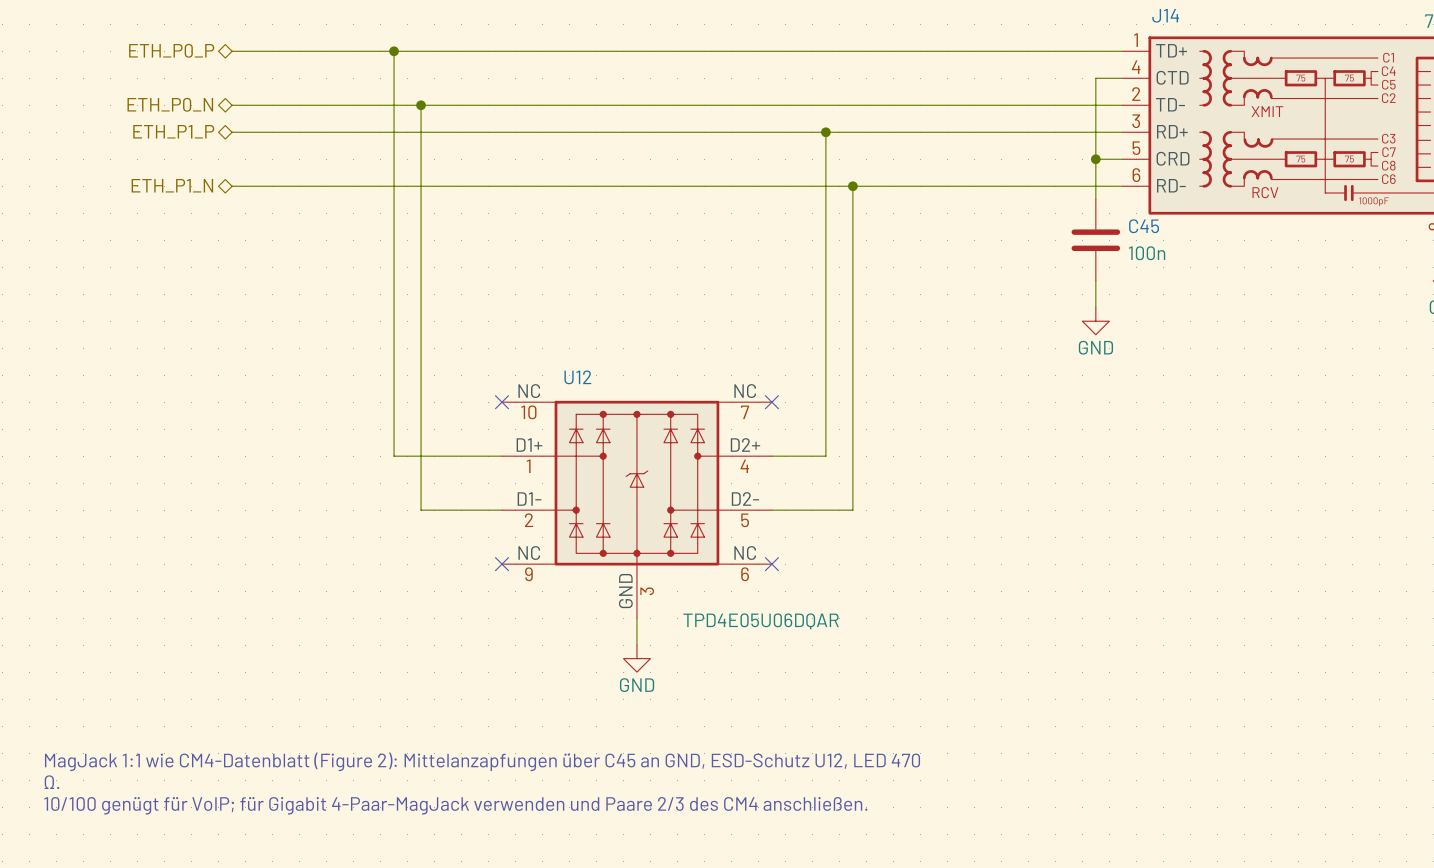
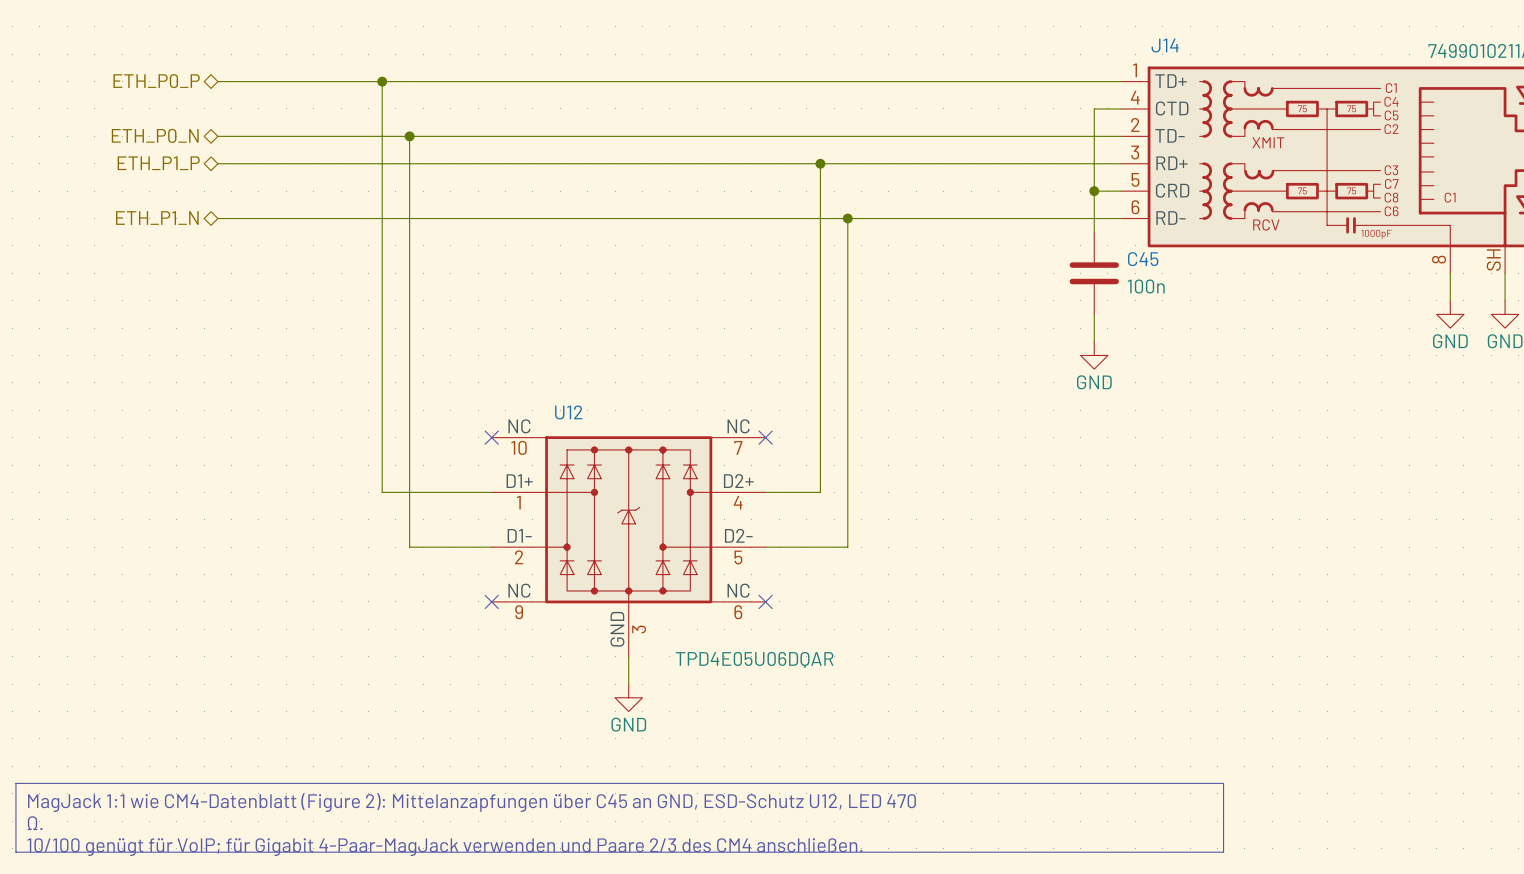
line: none -> (15, 783) (1223, 783) (1223, 852) (15, 852) (15, 783)

